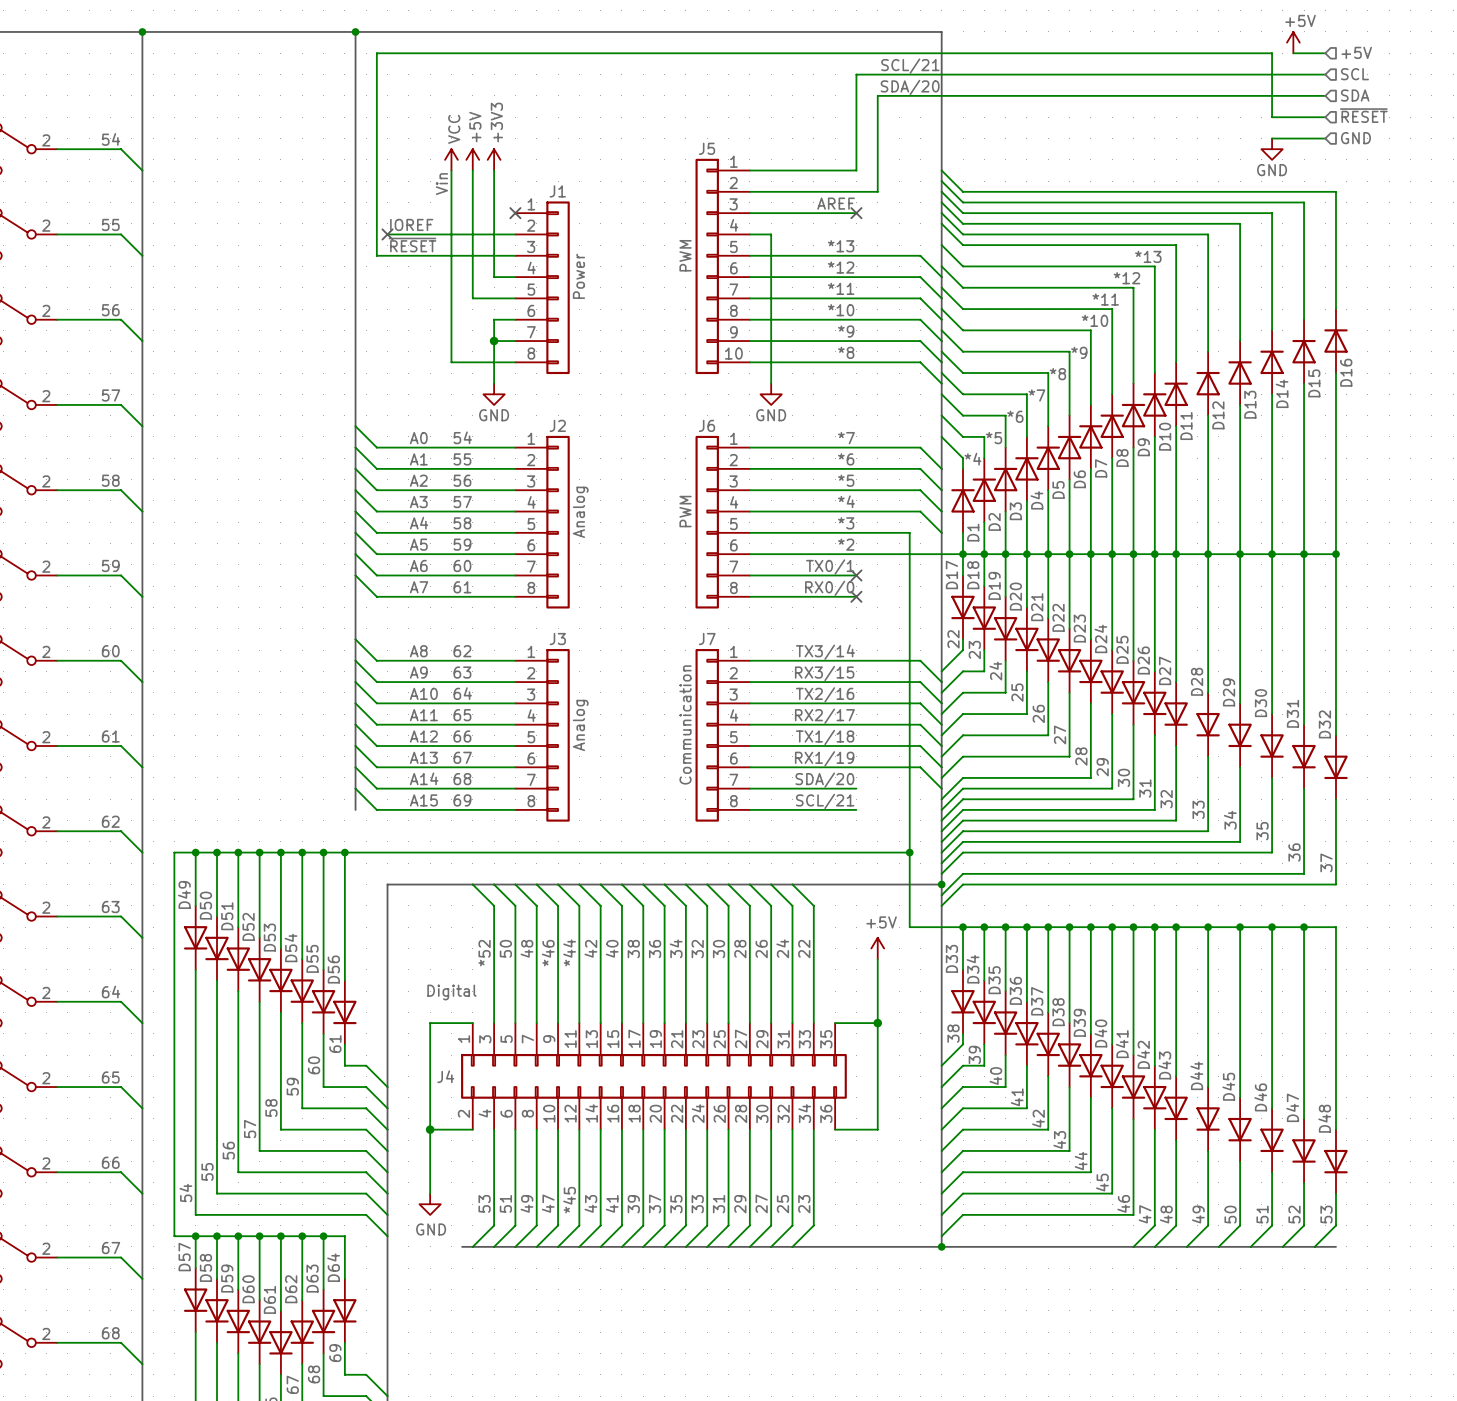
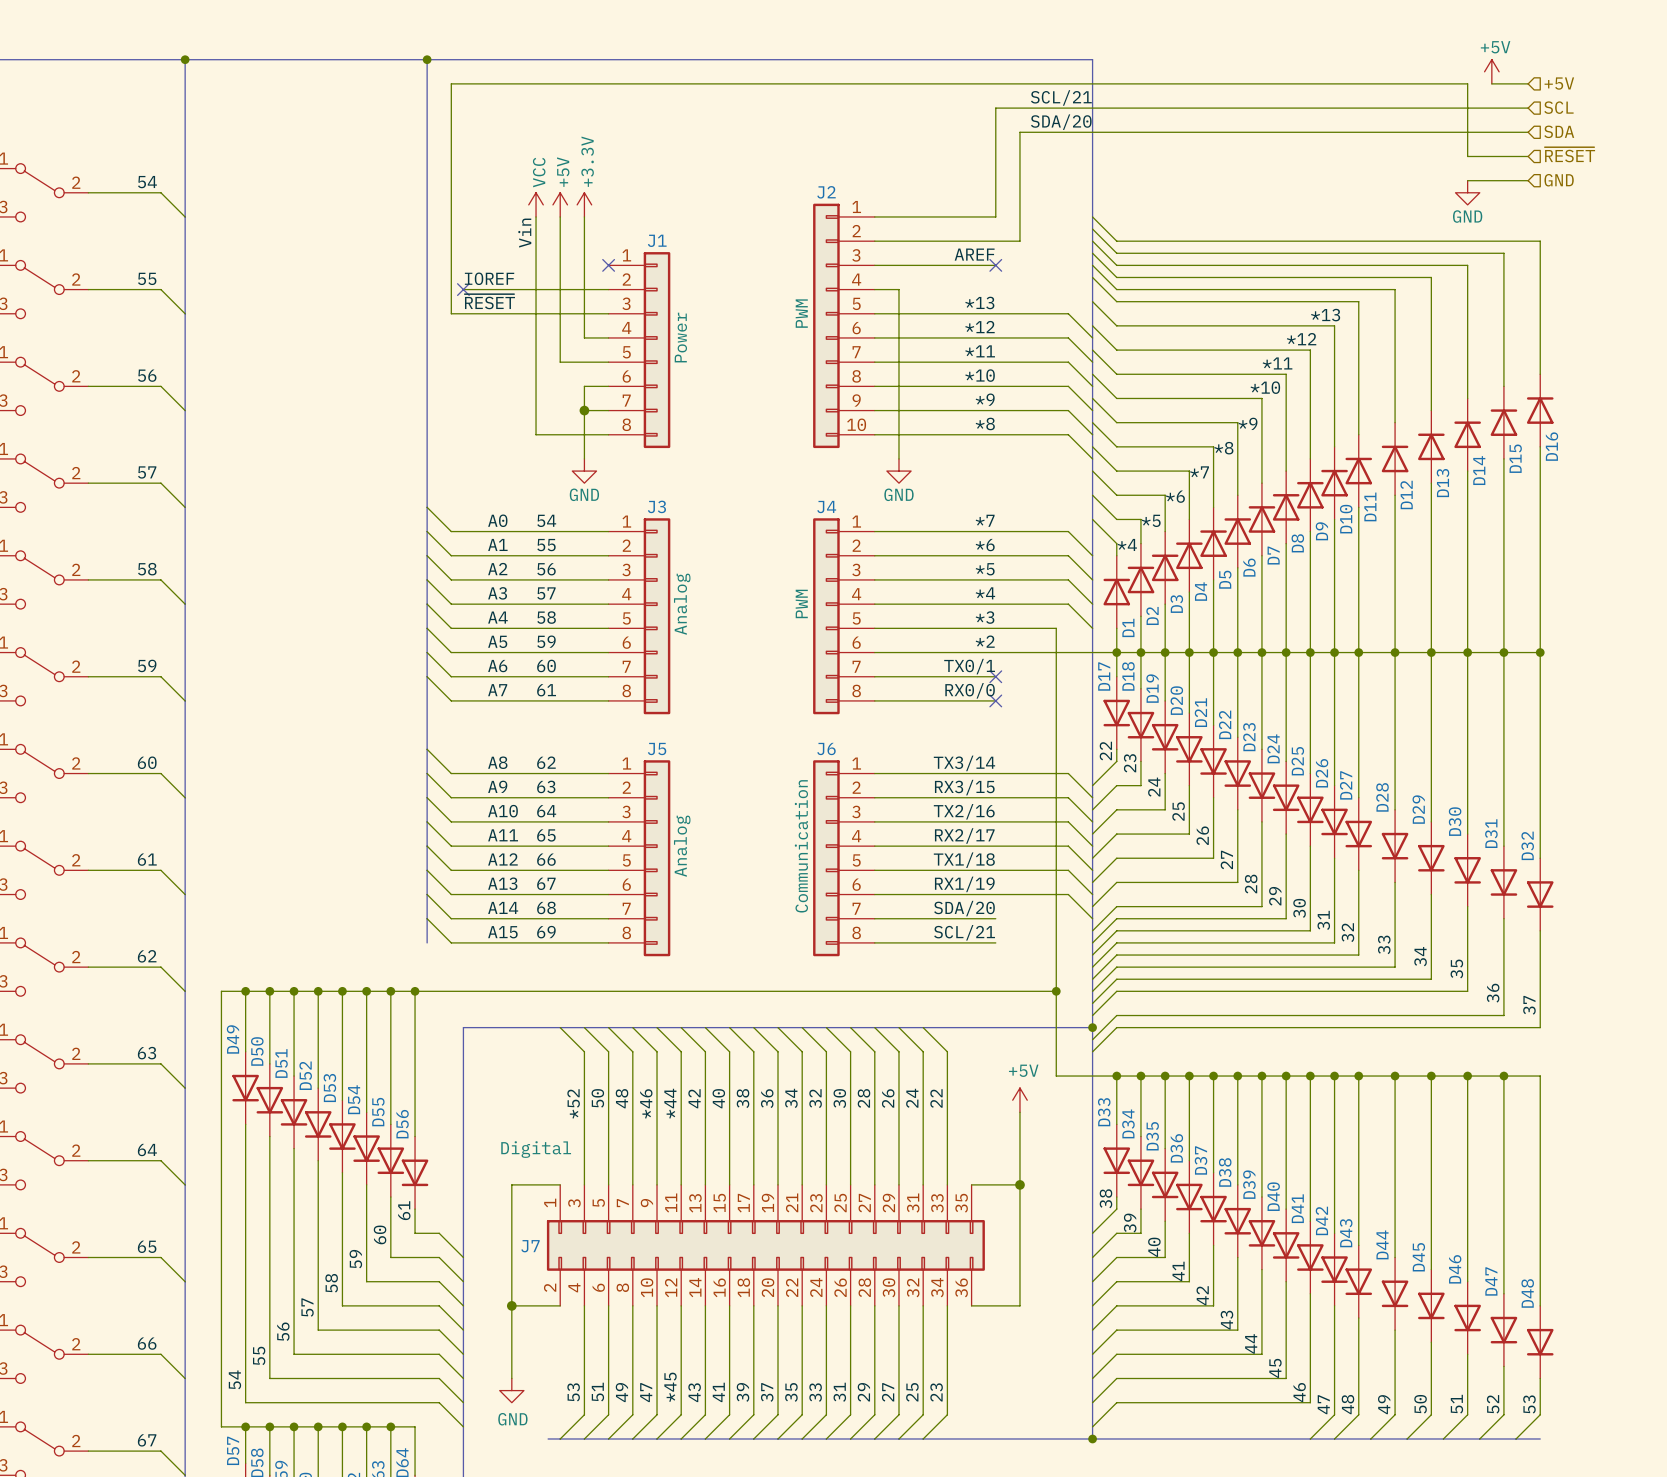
J5 name: J5 (706, 148) -> J2 (826, 192)
power symbol: +3V3 (494, 159) -> +3.3V (584, 204)
J2 name: J2 (557, 425) -> J3 (656, 506)
J6 name: J6 (706, 425) -> J4 (826, 507)
J3 name: J3 (557, 639) -> J5 (657, 748)
J7 name: J7 (707, 639) -> J6 (826, 748)
J4 name: J4 (445, 1076) -> J7 (530, 1246)

